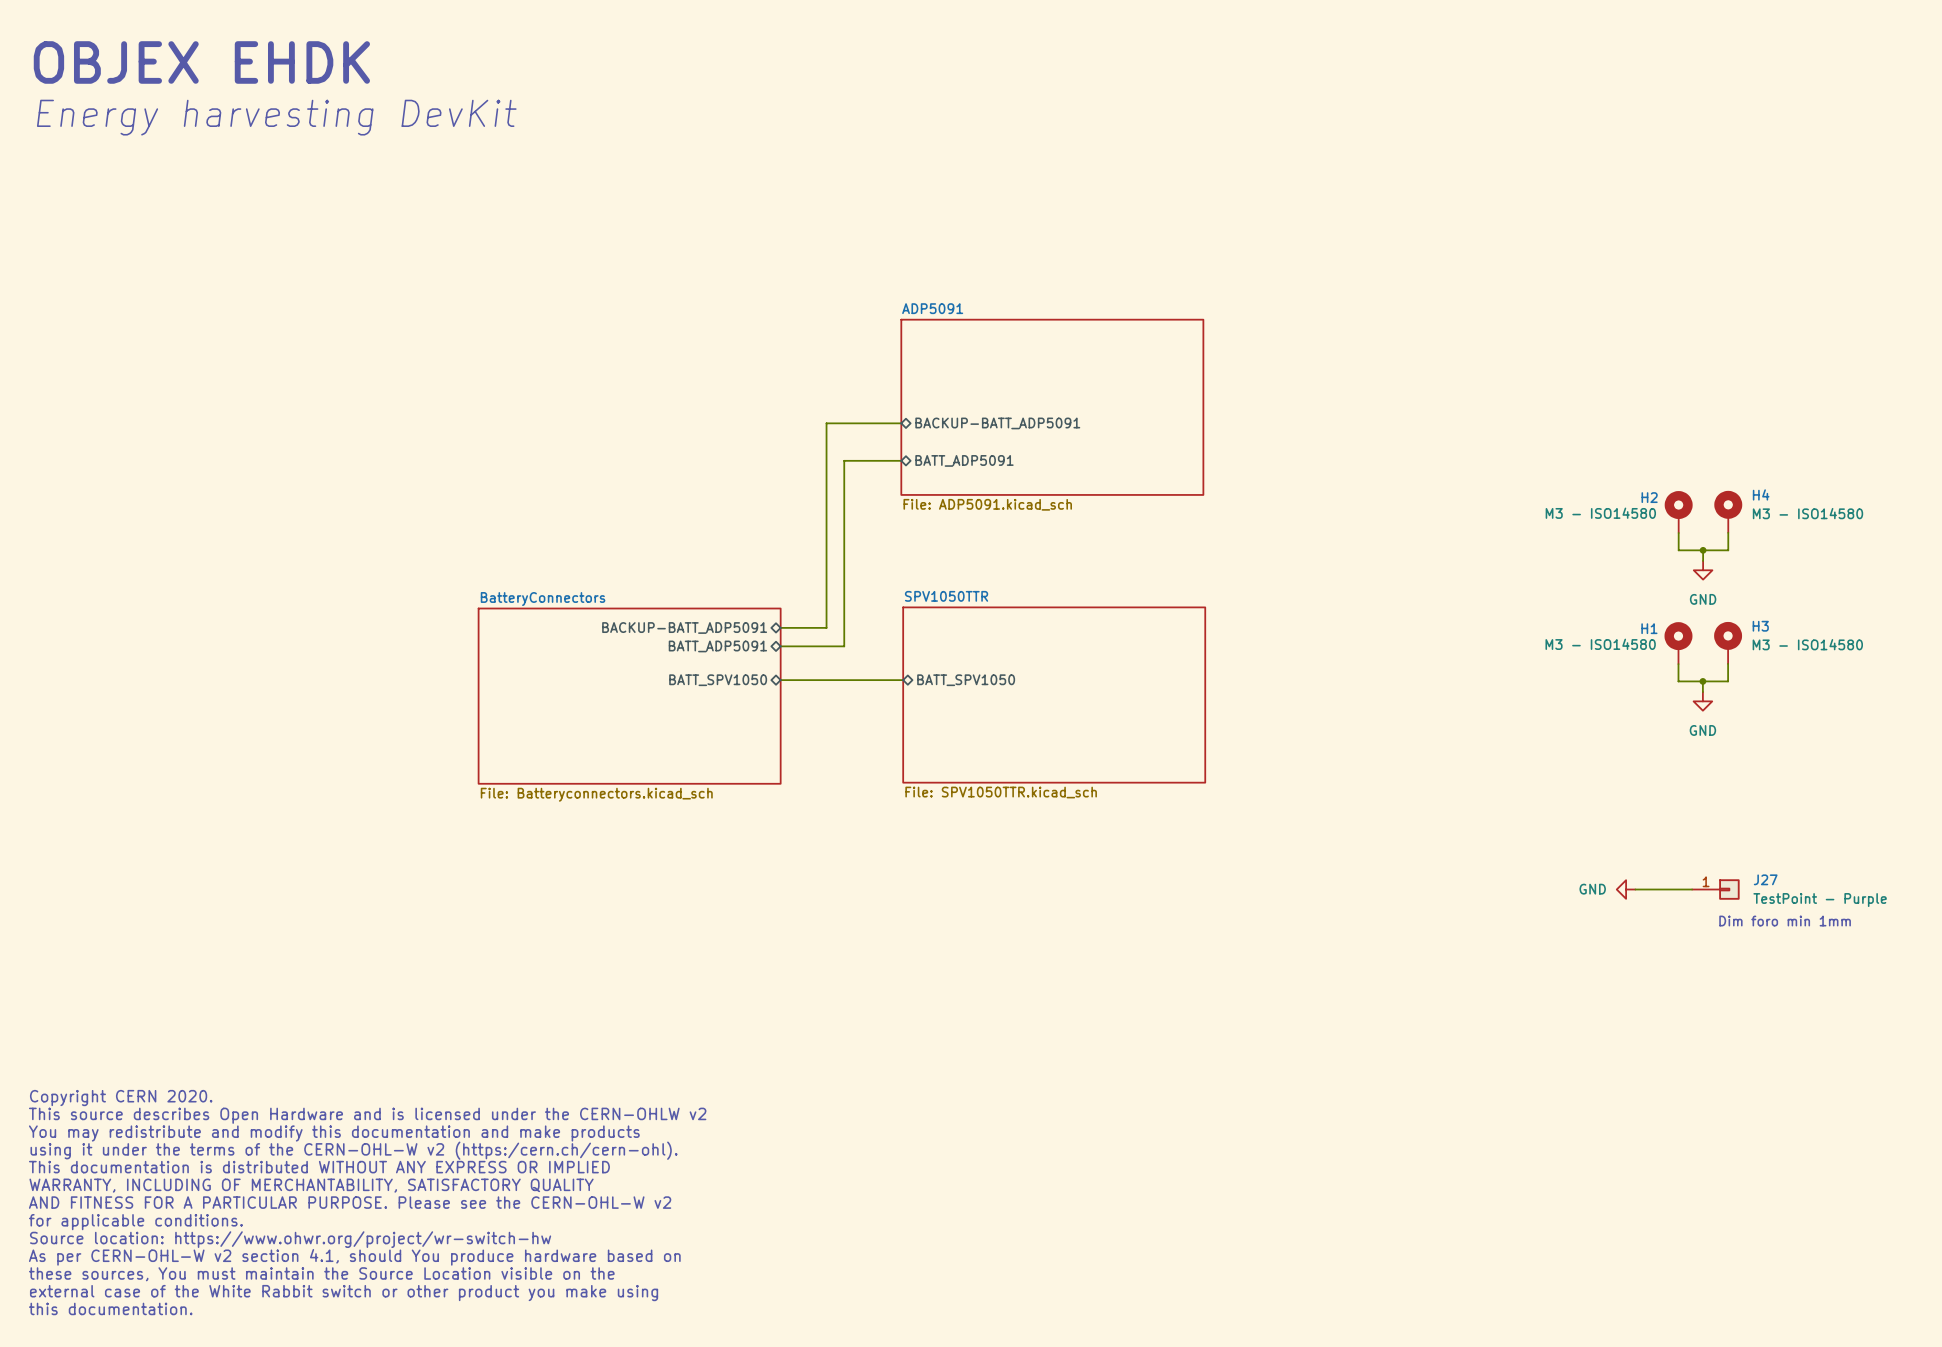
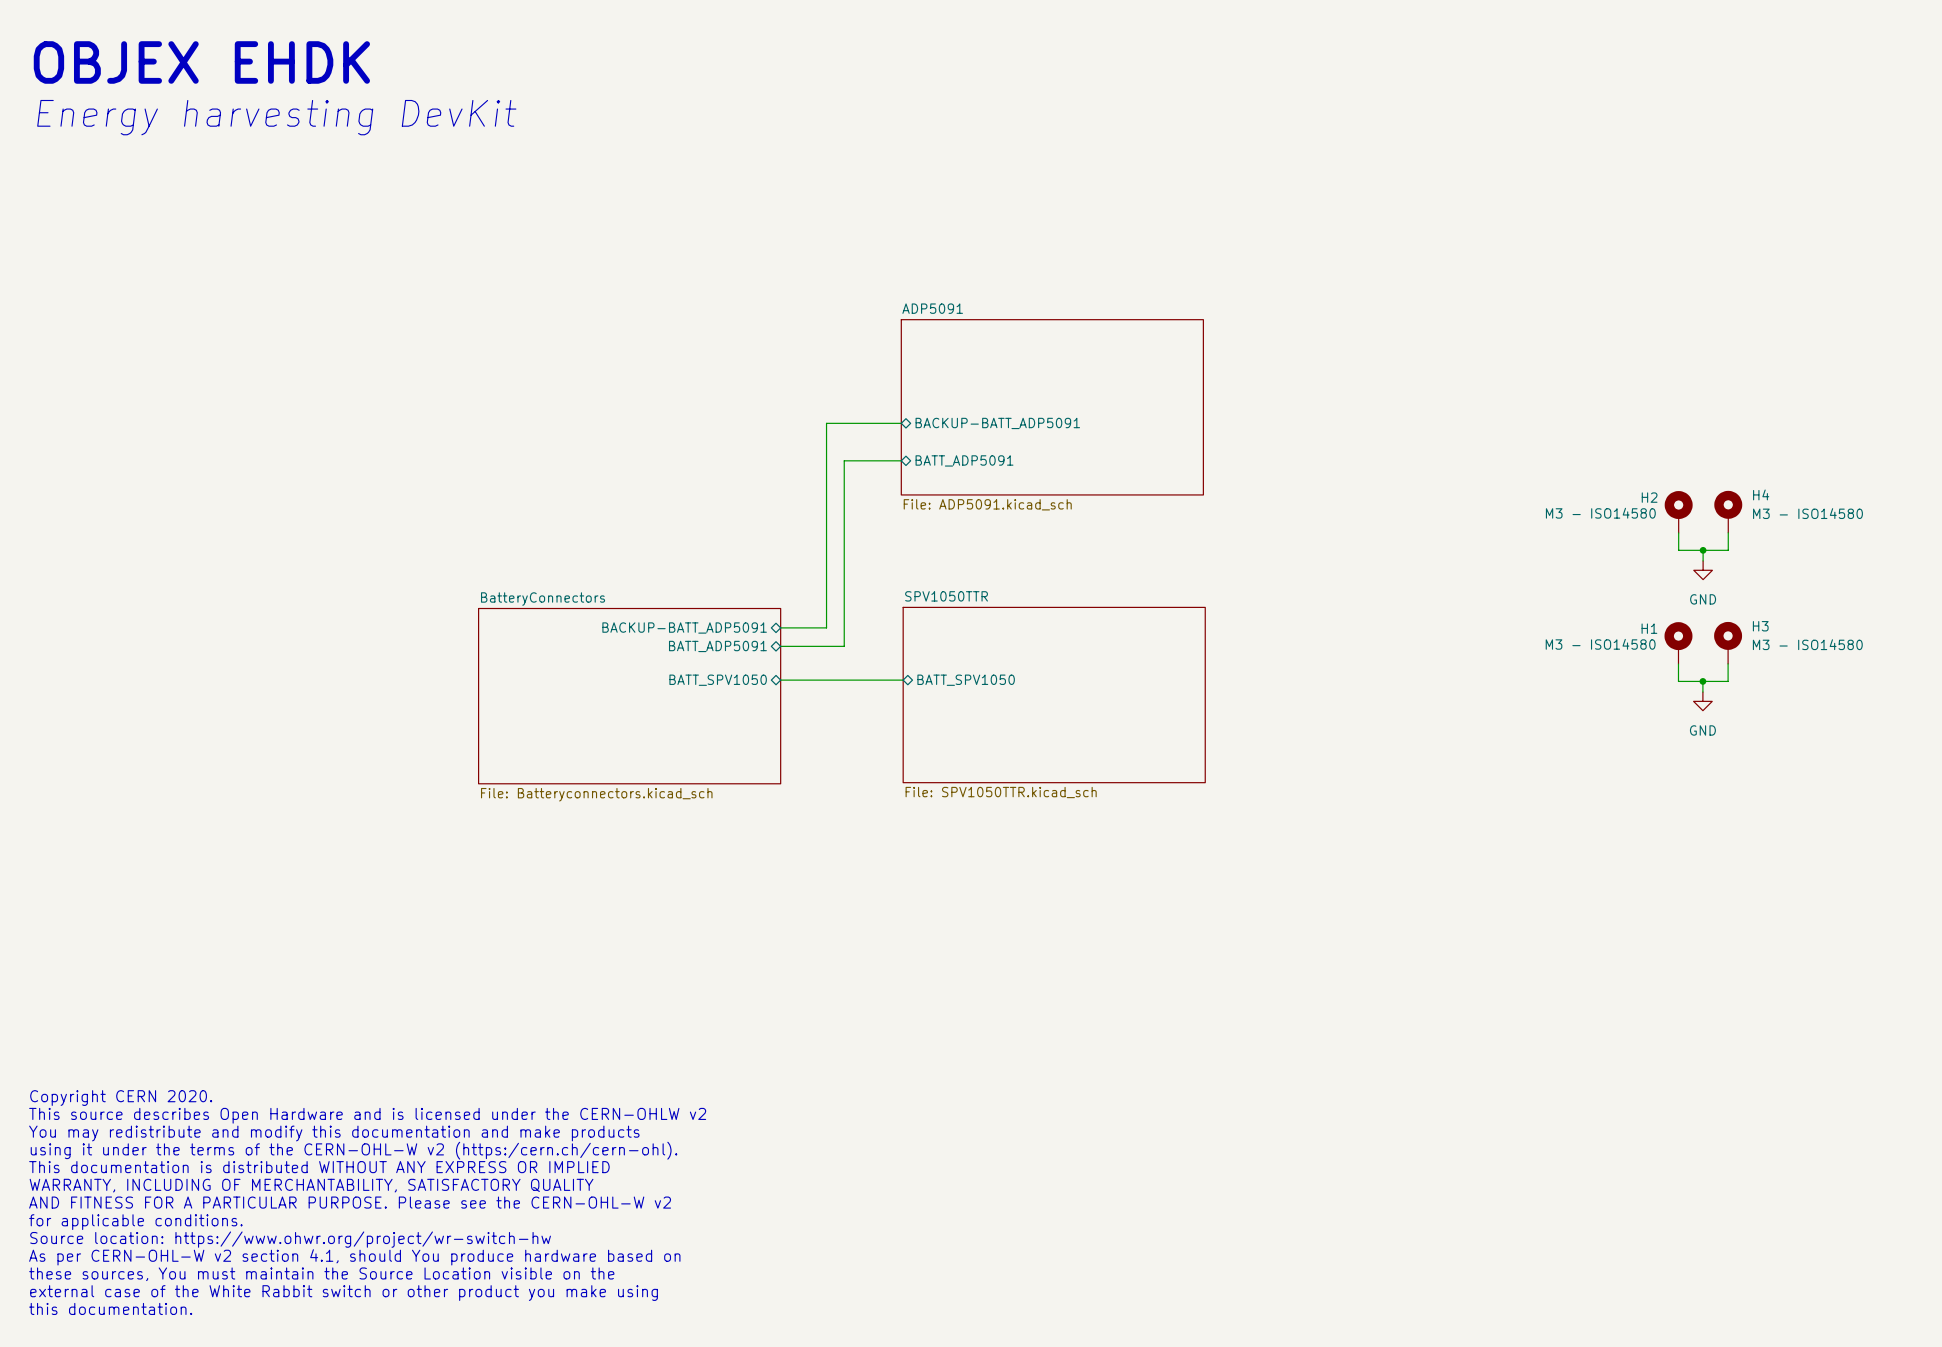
power symbol: GND (1626, 889) -> none
wire: (1635, 889) (1692, 889) -> none
J27: TestPoint - Purple (1715, 889) -> none
text: Dim foro min 1mm (1785, 921) -> none

